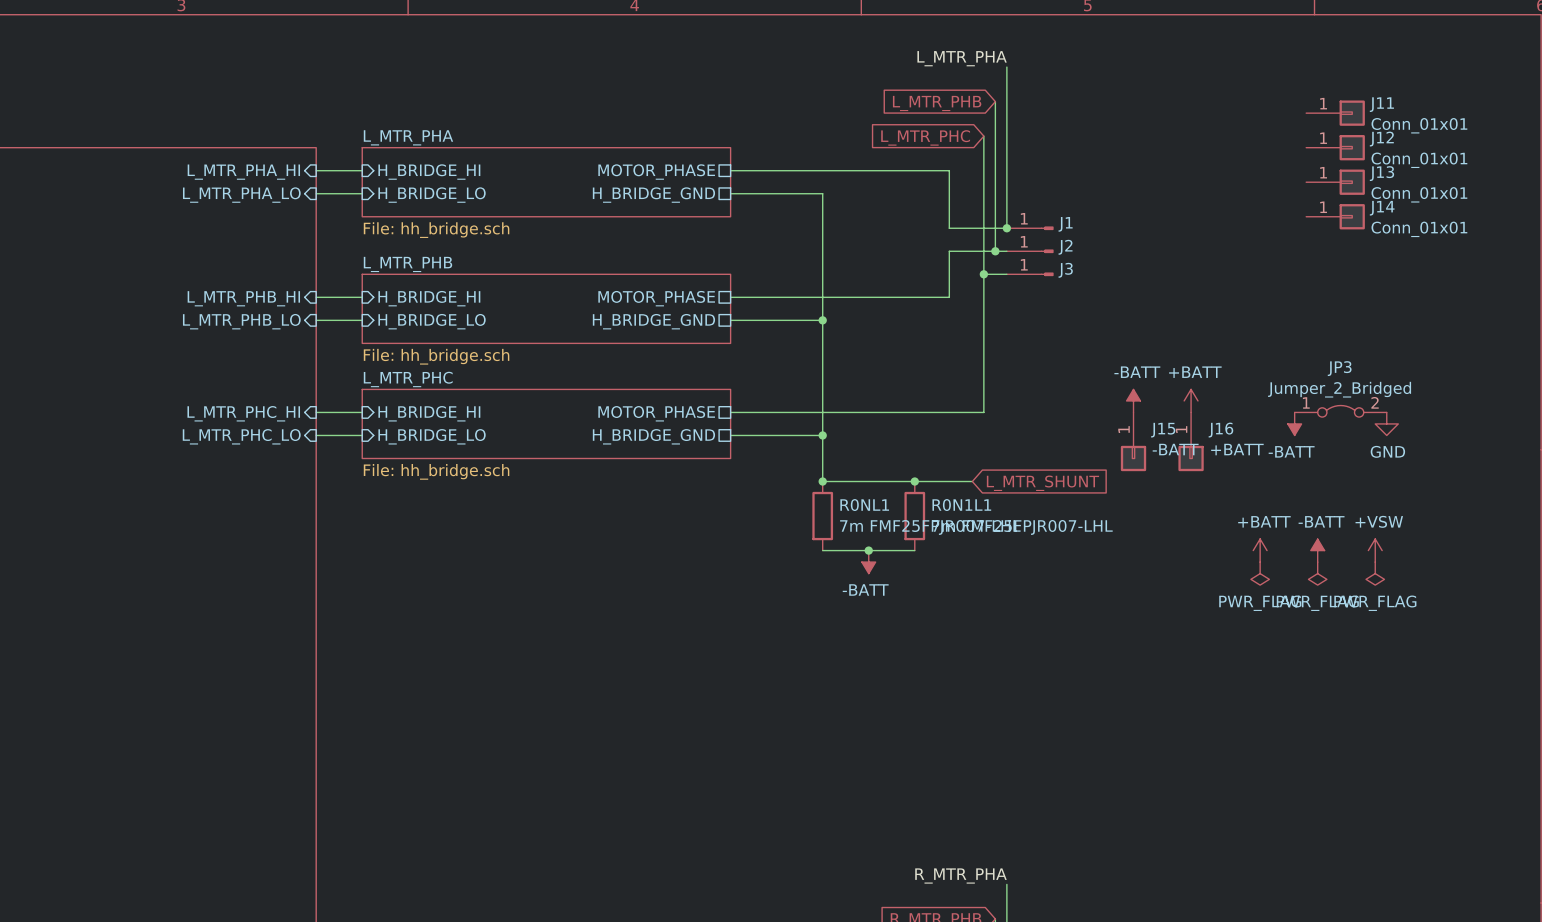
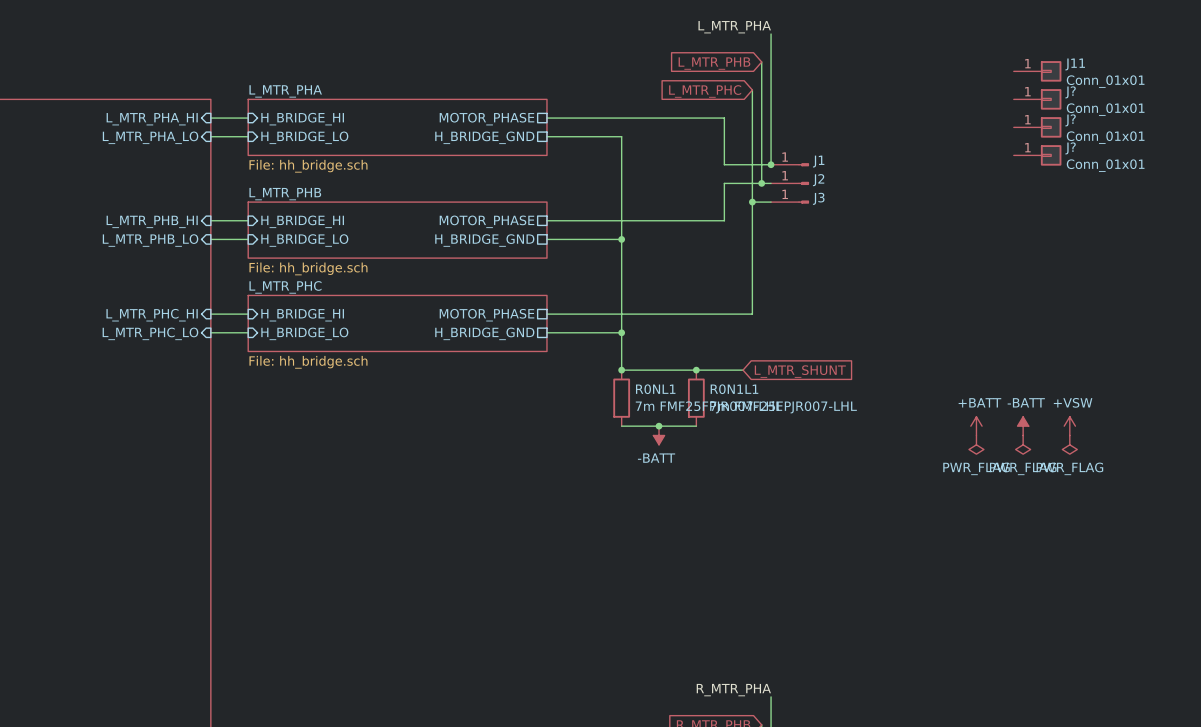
J12 name: J12 (1381, 139) -> J? (1070, 92)
J13 name: J13 (1381, 173) -> J? (1070, 120)
J14 name: J14 (1382, 208) -> J? (1070, 148)
power symbol: -BATT (1133, 400) -> none
power symbol: +BATT (1191, 400) -> none
JP3: Jumper_2_Bridged (1340, 411) -> none
power symbol: -BATT (1294, 423) -> none
power symbol: GND (1386, 423) -> none
J15: -BATT (1133, 441) -> none
J16: +BATT (1191, 441) -> none

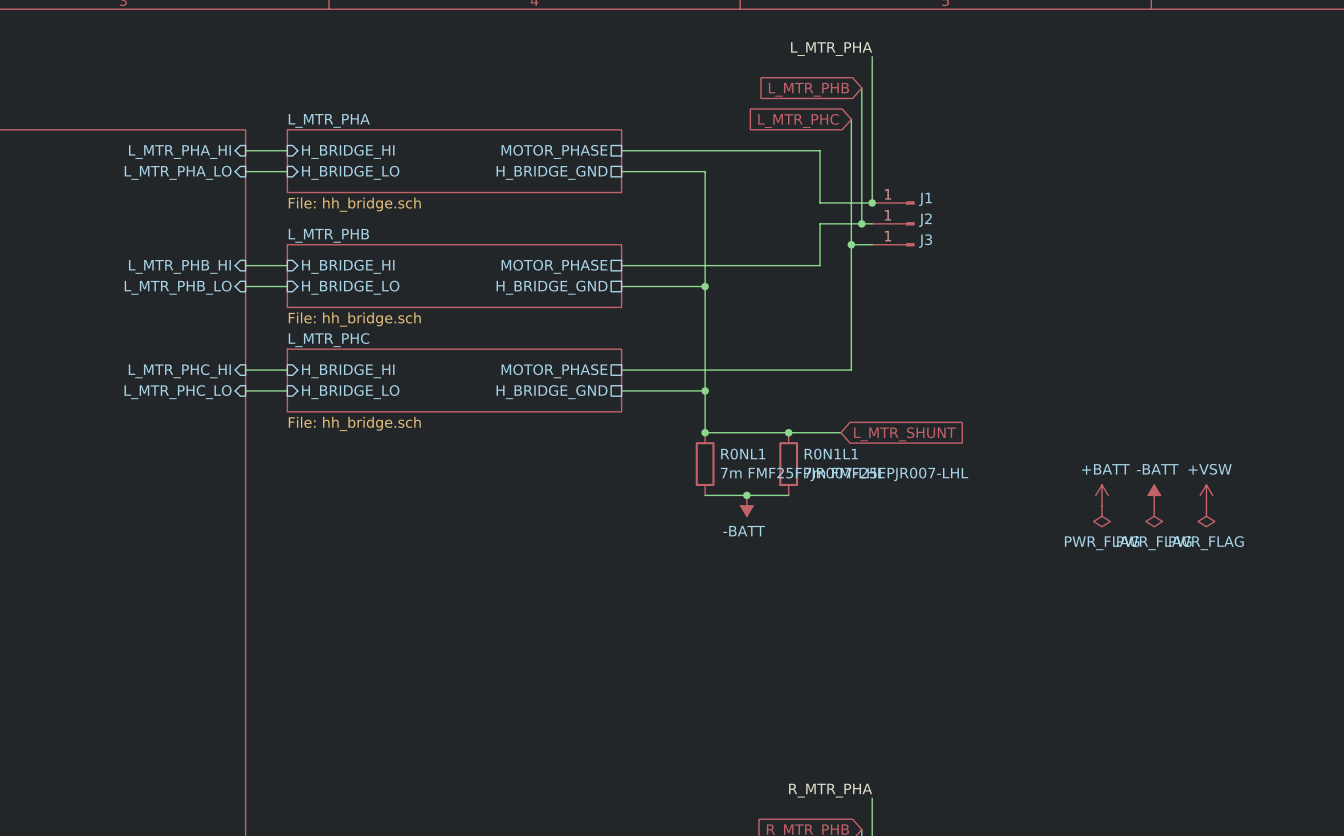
J11: Conn_01x01 (1037, 71) -> none
J?: Conn_01x01 (1037, 99) -> none
J?: Conn_01x01 (1037, 127) -> none
J?: Conn_01x01 (1037, 155) -> none

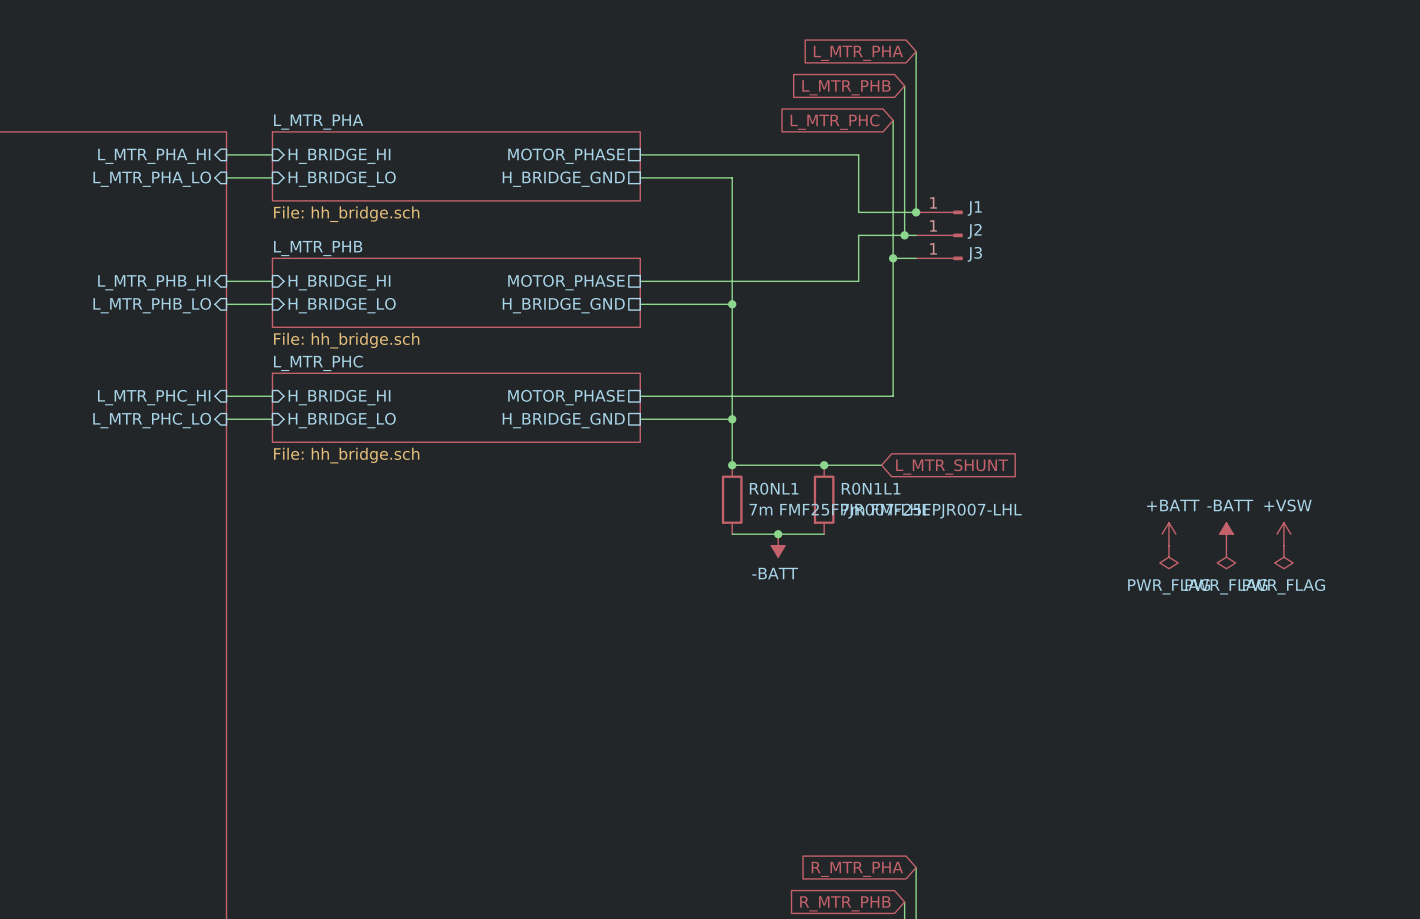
label: L_MTR_PHA (831, 49) -> none
global label: none -> L_MTR_PHA (858, 53)
label: R_MTR_PHA (830, 790) -> none
global label: none -> R_MTR_PHA (857, 869)

